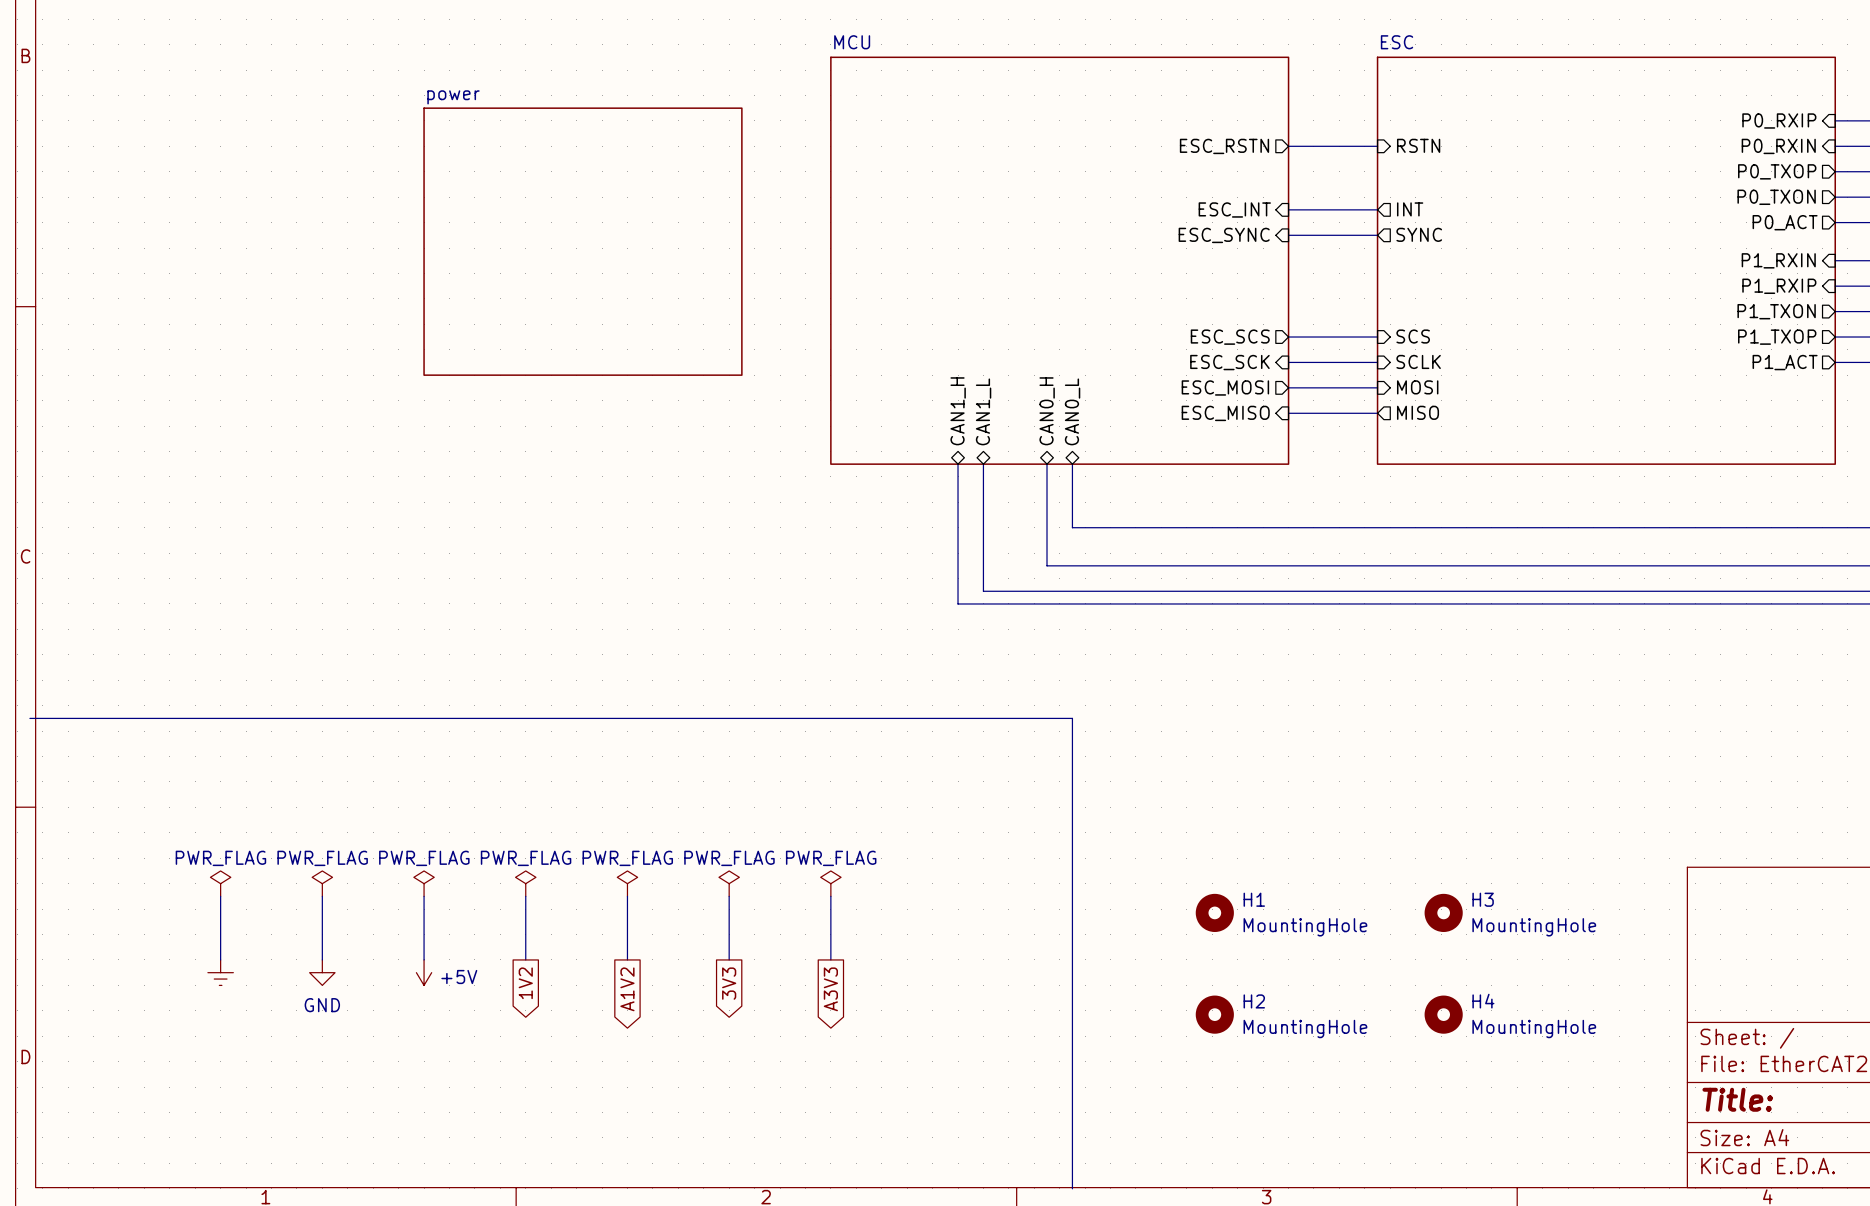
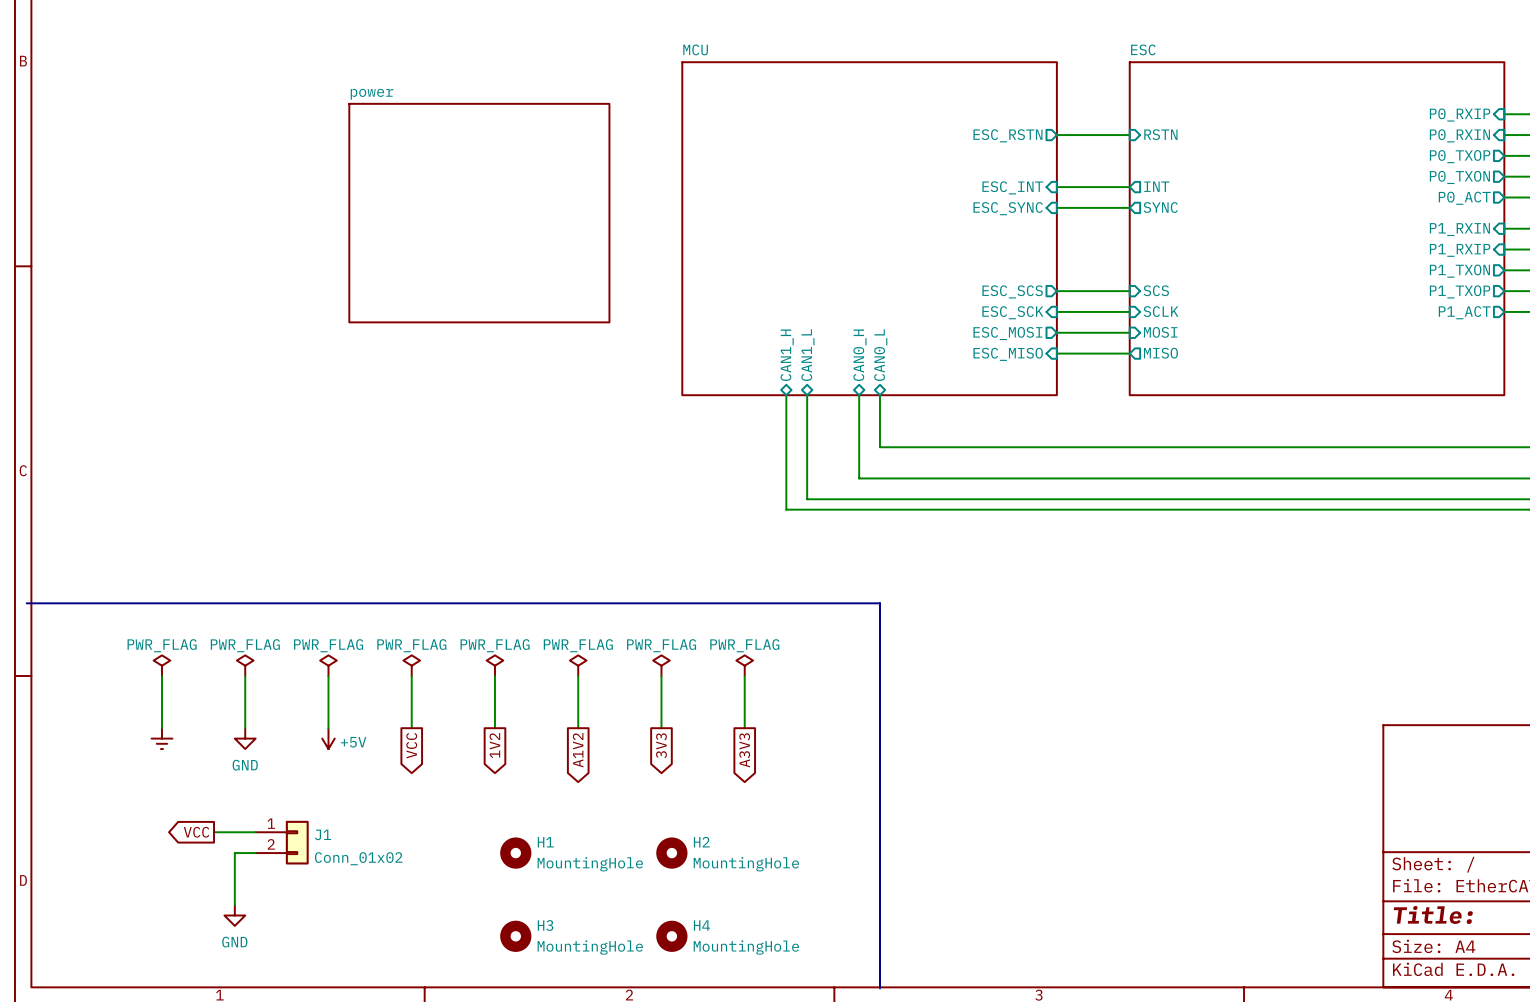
power symbol: none -> PWR_FLAG (161, 665)
power symbol: none -> PWR_FLAG (245, 665)
power symbol: none -> PWR_FLAG (328, 665)
power symbol: none -> PWR_FLAG (411, 665)
power symbol: none -> PWR_FLAG (494, 665)
power symbol: none -> PWR_FLAG (578, 665)
power symbol: none -> PWR_FLAG (661, 665)
power symbol: none -> PWR_FLAG (744, 665)
wire: none -> (744, 676) (744, 728)
power symbol: PWR_FLAG (220, 883) -> none
power symbol: none -> GND (245, 738)
power symbol: PWR_FLAG (322, 883) -> none
power symbol: PWR_FLAG (424, 883) -> none
power symbol: PWR_FLAG (525, 883) -> none
power symbol: PWR_FLAG (627, 883) -> none
power symbol: PWR_FLAG (729, 883) -> none
power symbol: PWR_FLAG (830, 883) -> none
global label: none -> VCC (411, 745)
wire: (220, 896) (220, 959) -> (161, 676) (161, 728)
wire: (322, 896) (322, 959) -> (245, 676) (245, 728)
wire: (424, 896) (424, 959) -> (328, 676) (328, 728)
wire: (525, 896) (525, 959) -> (411, 676) (411, 728)
wire: (627, 896) (627, 959) -> (494, 676) (494, 728)
wire: (729, 896) (729, 959) -> (578, 676) (578, 728)
wire: (830, 896) (830, 959) -> (661, 676) (661, 728)
H1 position: (1214, 912) -> (515, 853)
H3 position: (1443, 912) -> (515, 936)
power symbol position: (220, 972) -> (161, 738)
power symbol: GND (322, 972) -> none
power symbol position: +5V (424, 972) -> +5V (328, 738)
global label position: 1V2 (525, 983) -> 1V2 (494, 745)
global label position: 3V3 (729, 983) -> 3V3 (661, 745)
global label position: A1V2 (627, 989) -> A1V2 (578, 750)
global label position: A3V3 (830, 989) -> A3V3 (744, 750)
global label: none -> VCC (196, 832)
wire: none -> (214, 832) (255, 832)
J1: none -> Conn_01x02 (282, 842)
H2 position: (1214, 1014) -> (671, 853)
H4 position: (1443, 1014) -> (671, 936)
wire: none -> (255, 853) (234, 853) (234, 905)
power symbol: none -> GND (234, 915)

